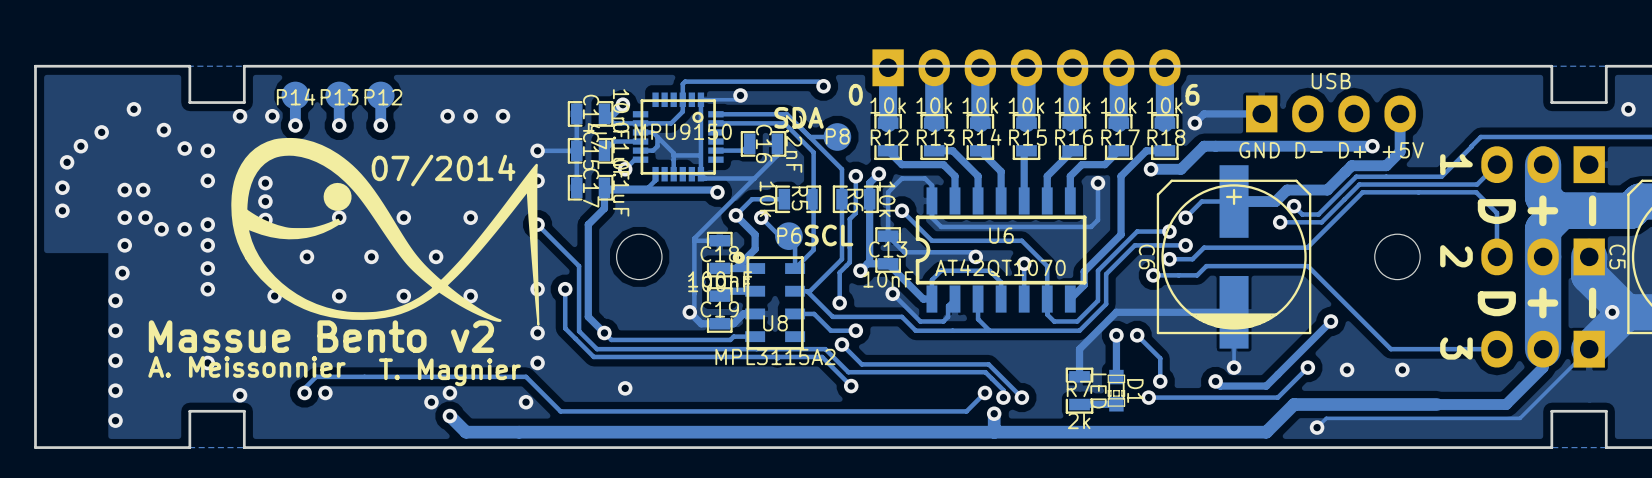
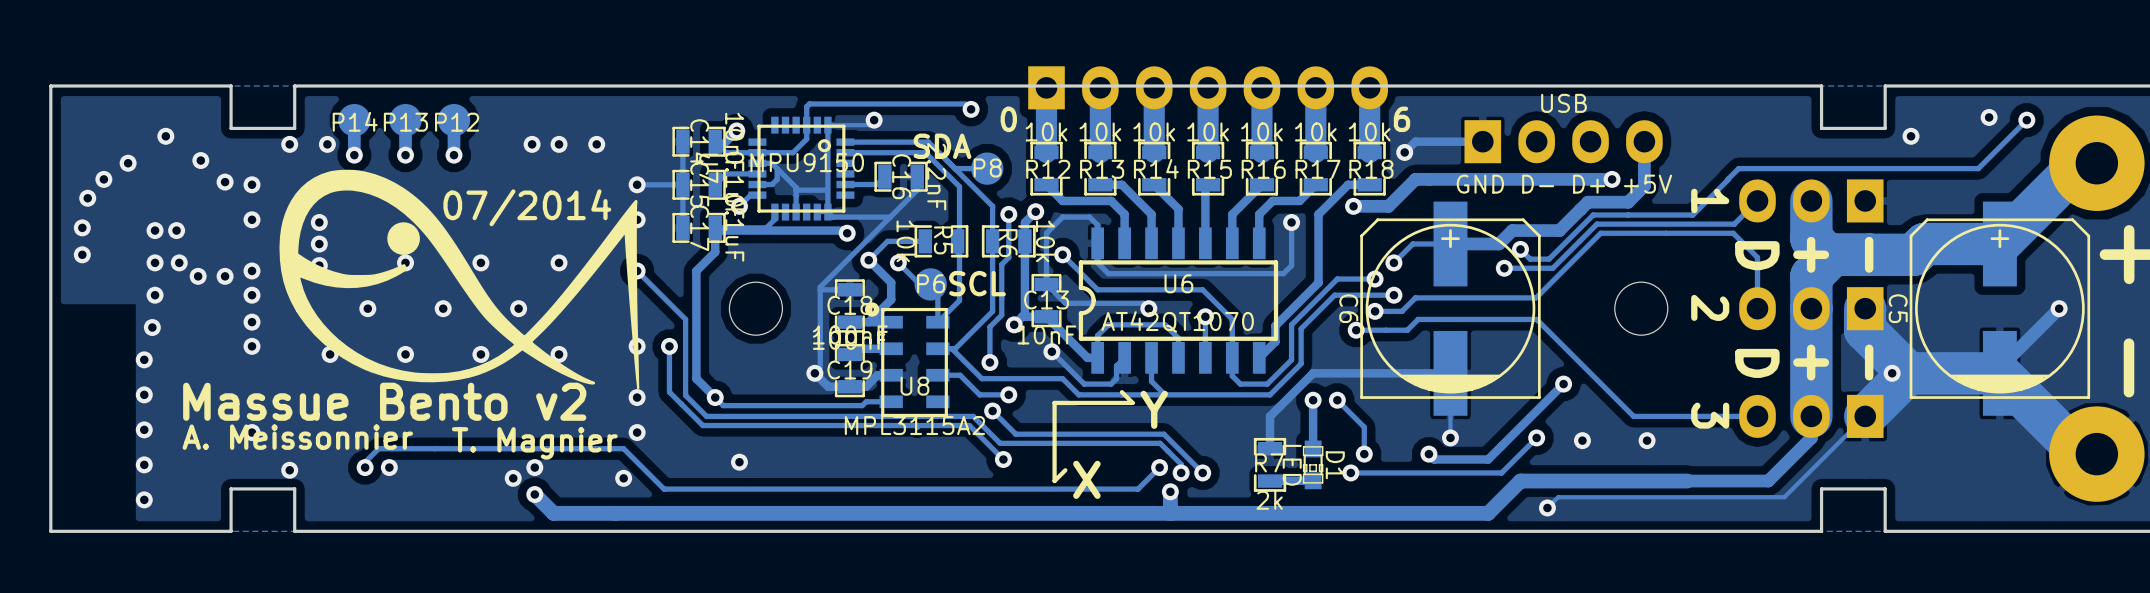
line: none -> (1121, 392) (1132, 402) (1054, 402) (1054, 481) (1065, 470)
text: none -> Y (1154, 409)
text: none -> X (1086, 479)

